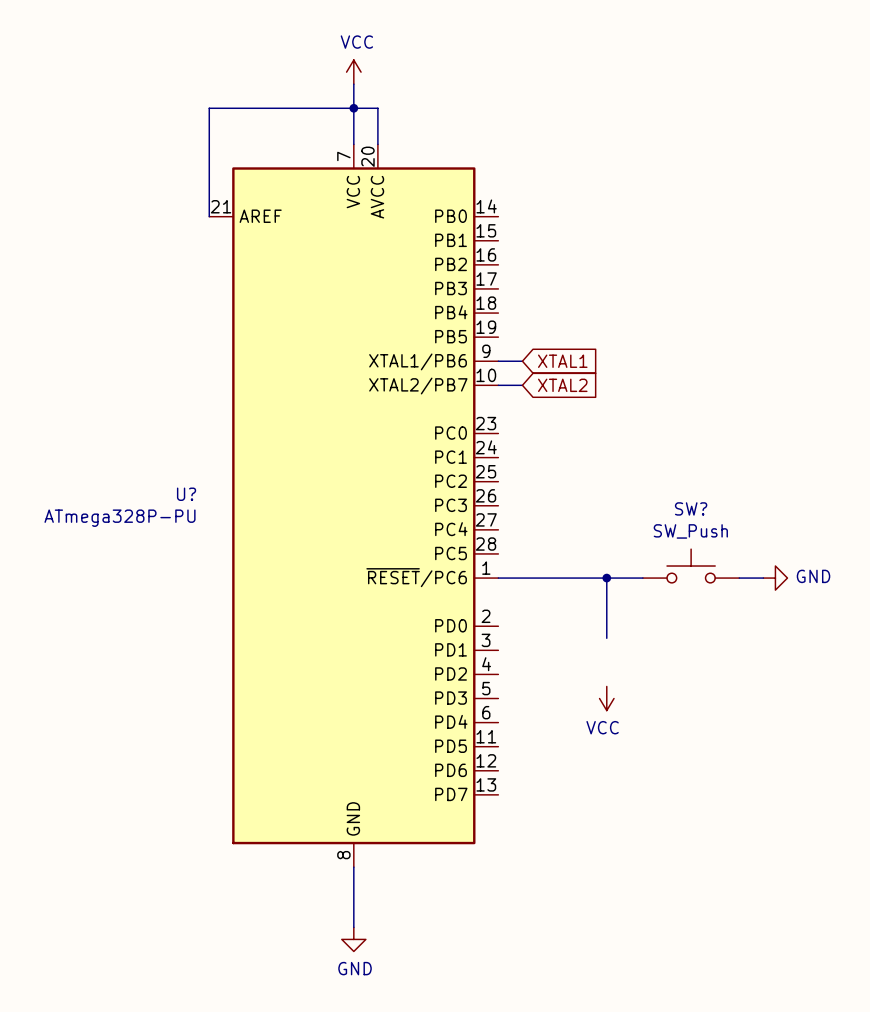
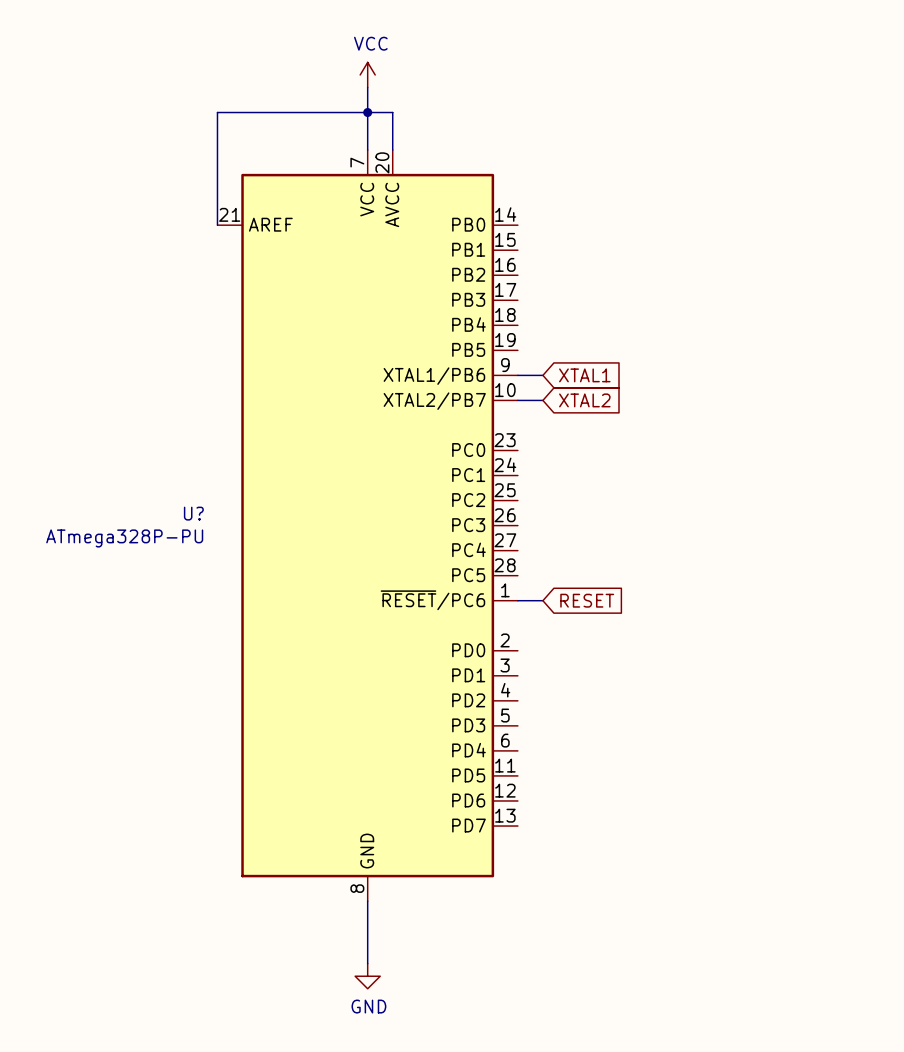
SW?: SW_Push (691, 566) -> none
wire: (522, 578) (642, 578) -> none
global label: none -> RESET (587, 600)
wire: (606, 578) (606, 638) -> none
junction: (606, 578) -> none
wire: (739, 578) (763, 578) -> none
power symbol: GND (775, 578) -> none
power symbol: VCC (606, 698) -> none

